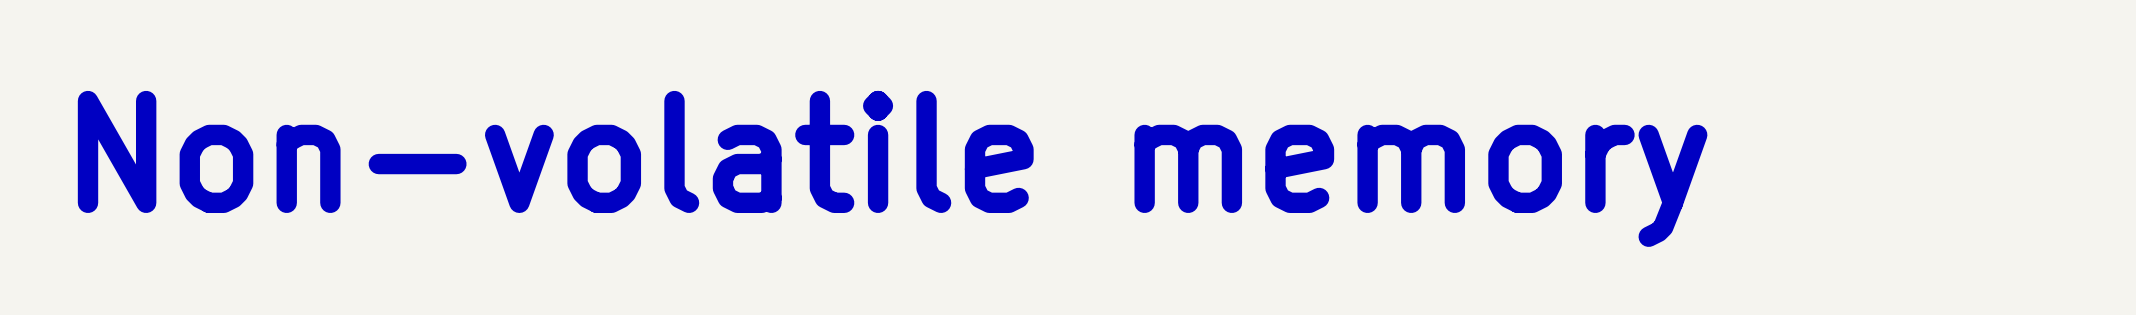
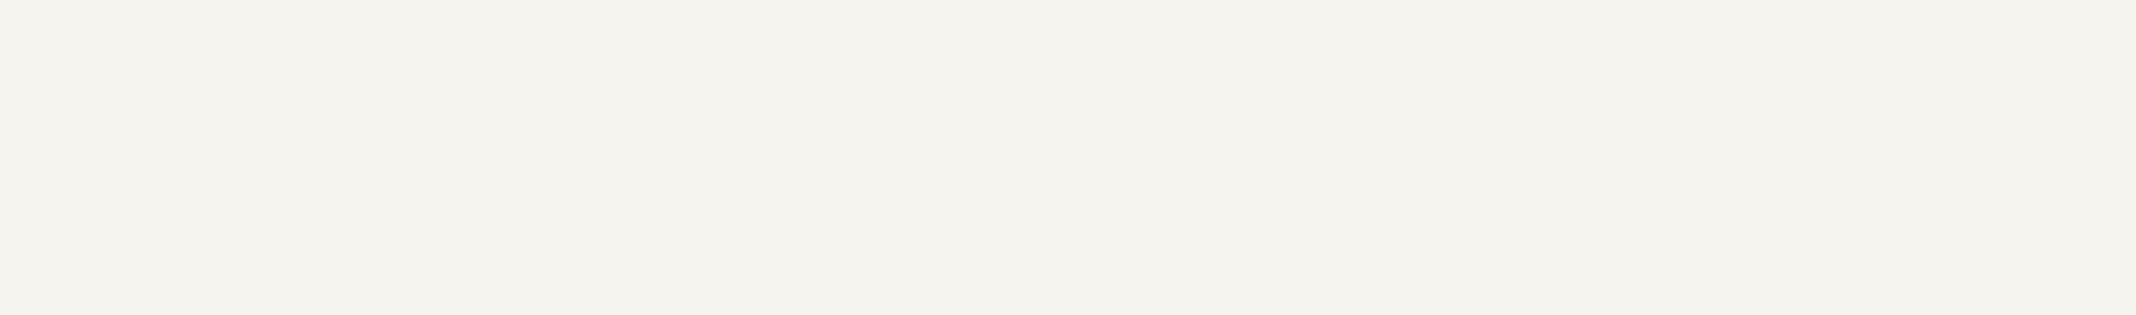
text: Non-volatile memory (892, 168) -> none

